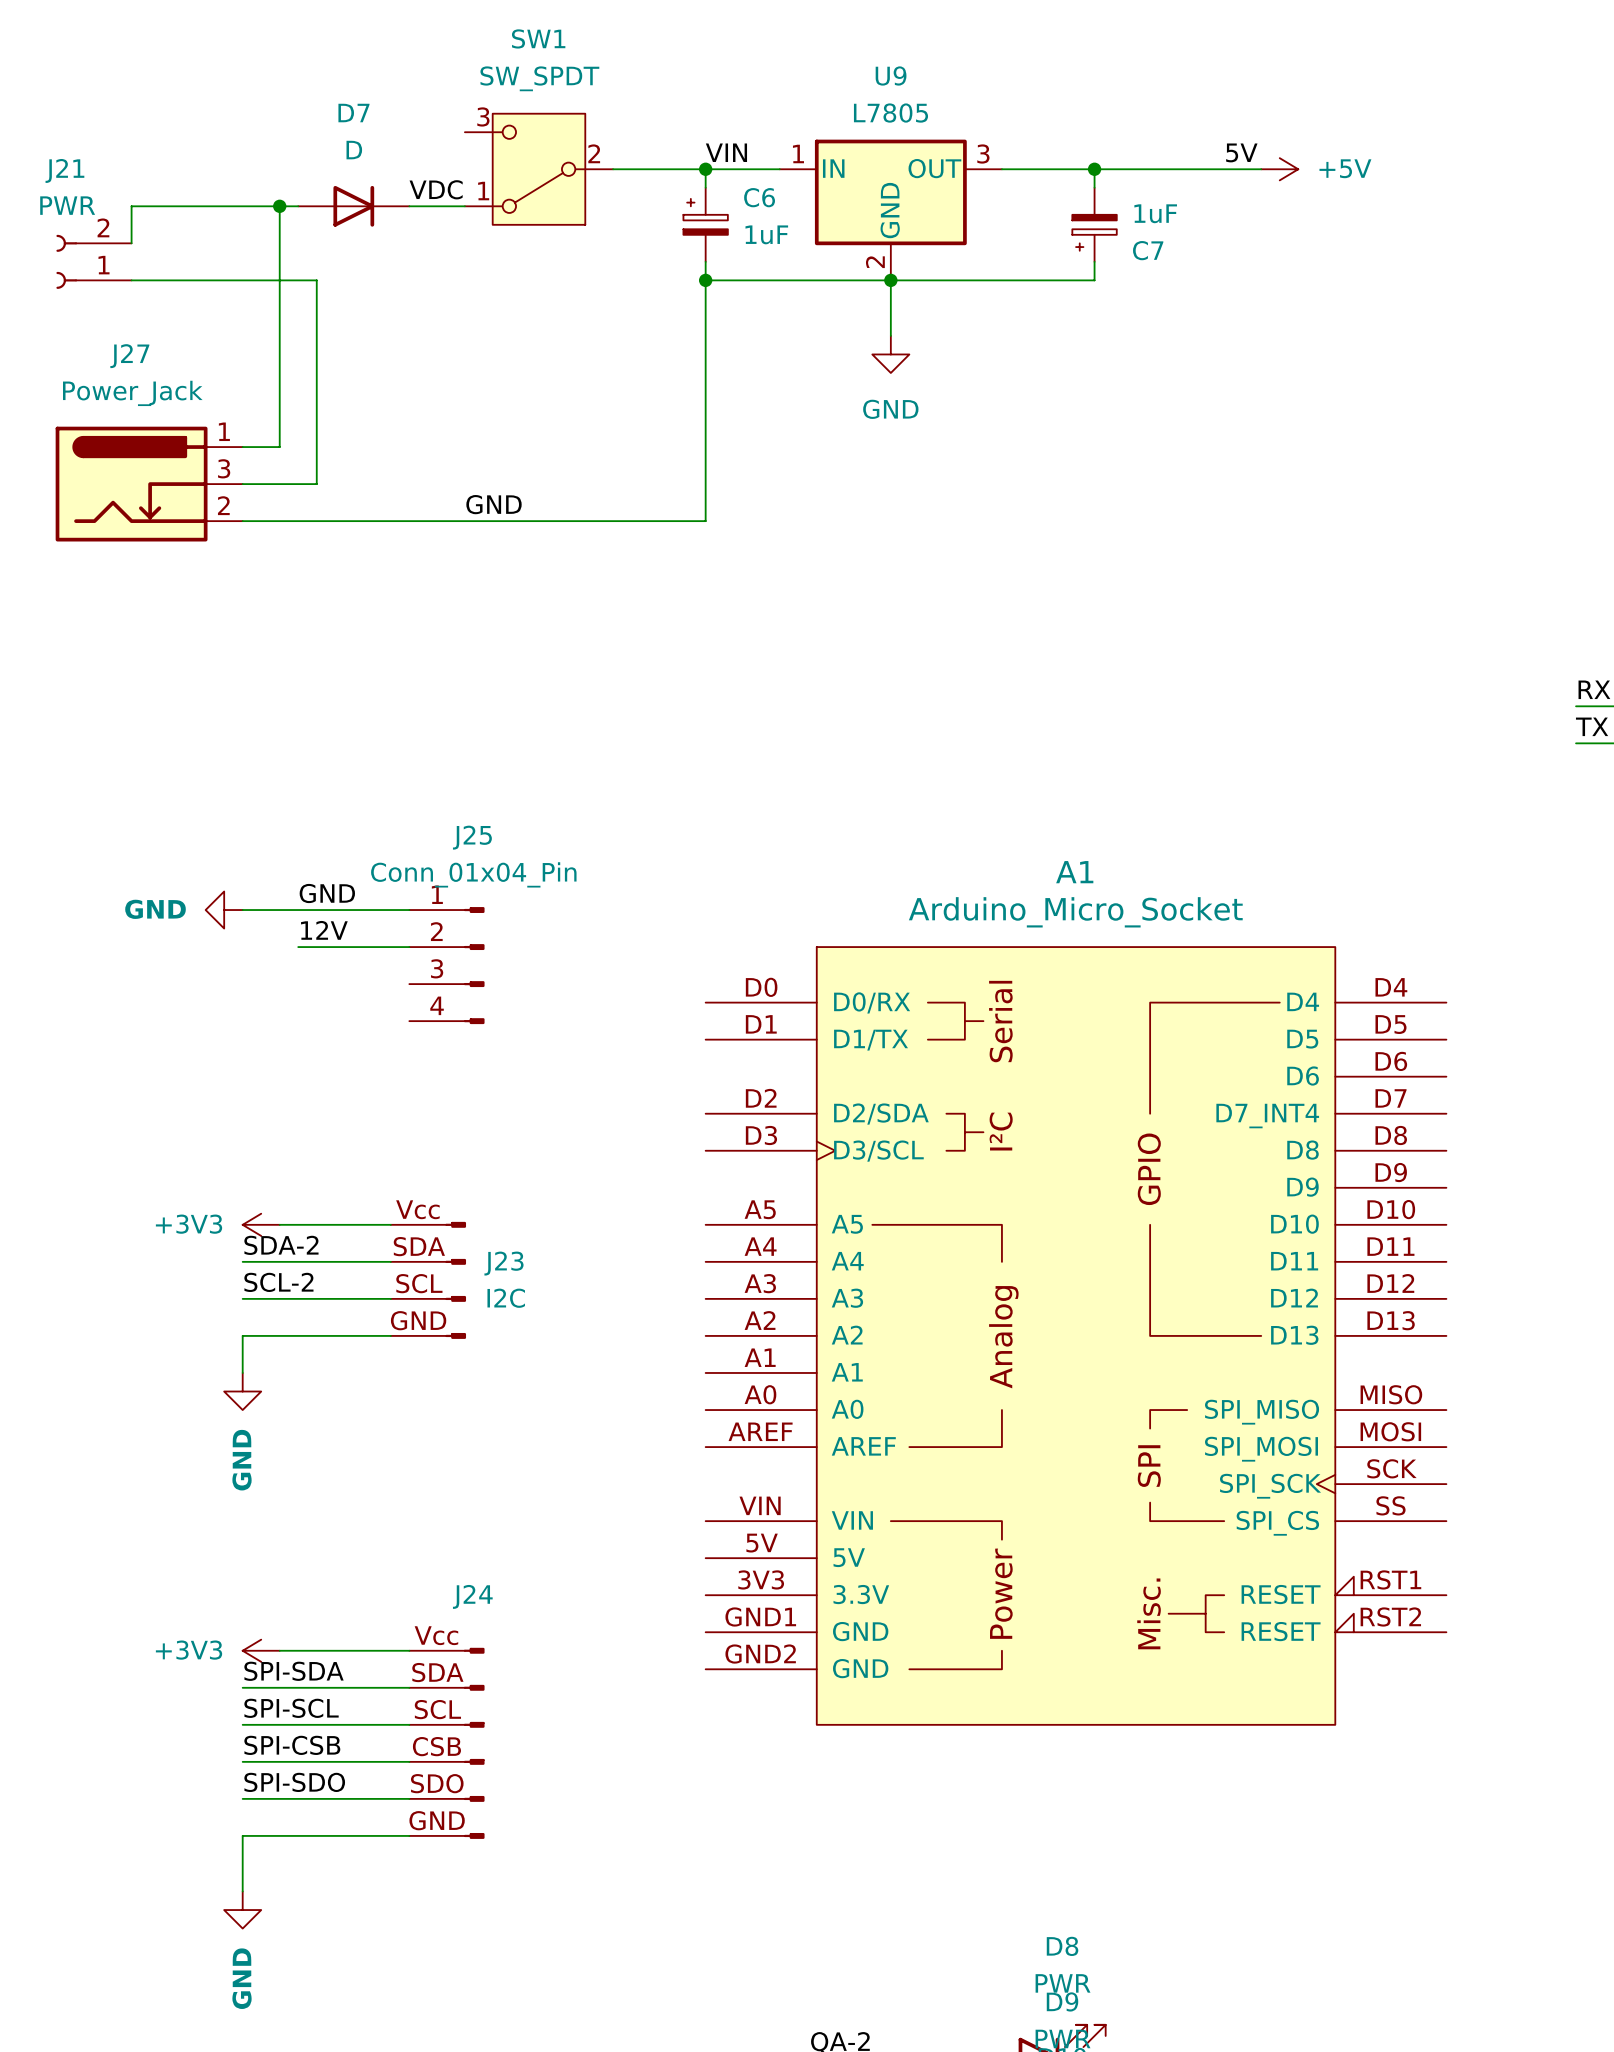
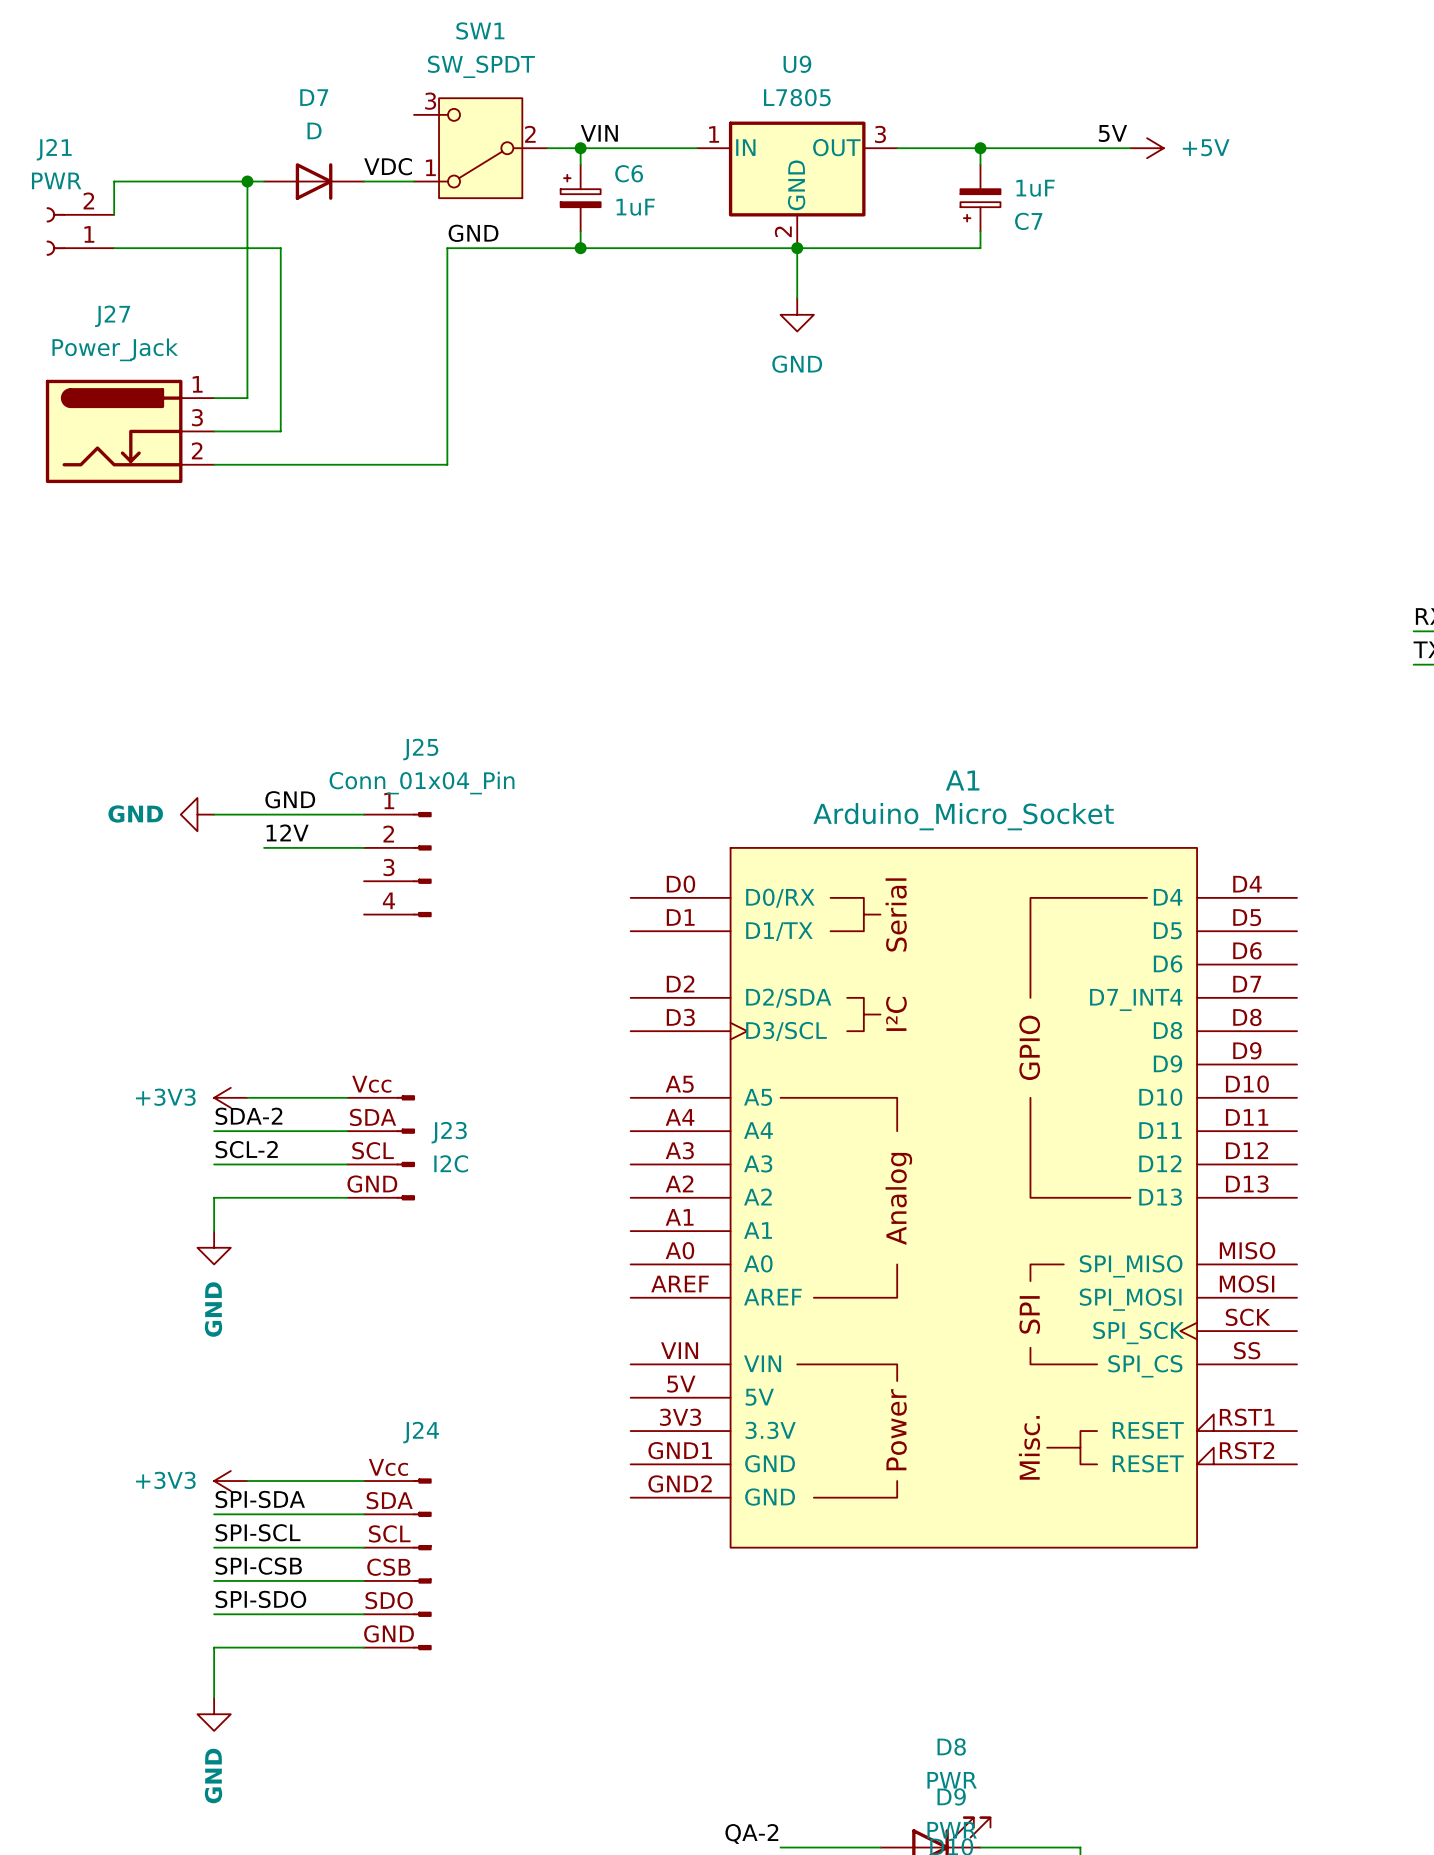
label position: VIN (726, 152) -> VIN (599, 133)
wire: (705, 169) (705, 187) -> (580, 148) (580, 164)
junction position: (705, 169) -> (580, 148)
C6 position: (705, 224) -> (580, 198)
wire: none -> (580, 231) (580, 248)
wire: (705, 261) (705, 521) (501, 521) -> (630, 248) (447, 248) (447, 464)
junction position: (705, 280) -> (580, 248)
label position: GND (494, 504) -> GND (473, 233)

